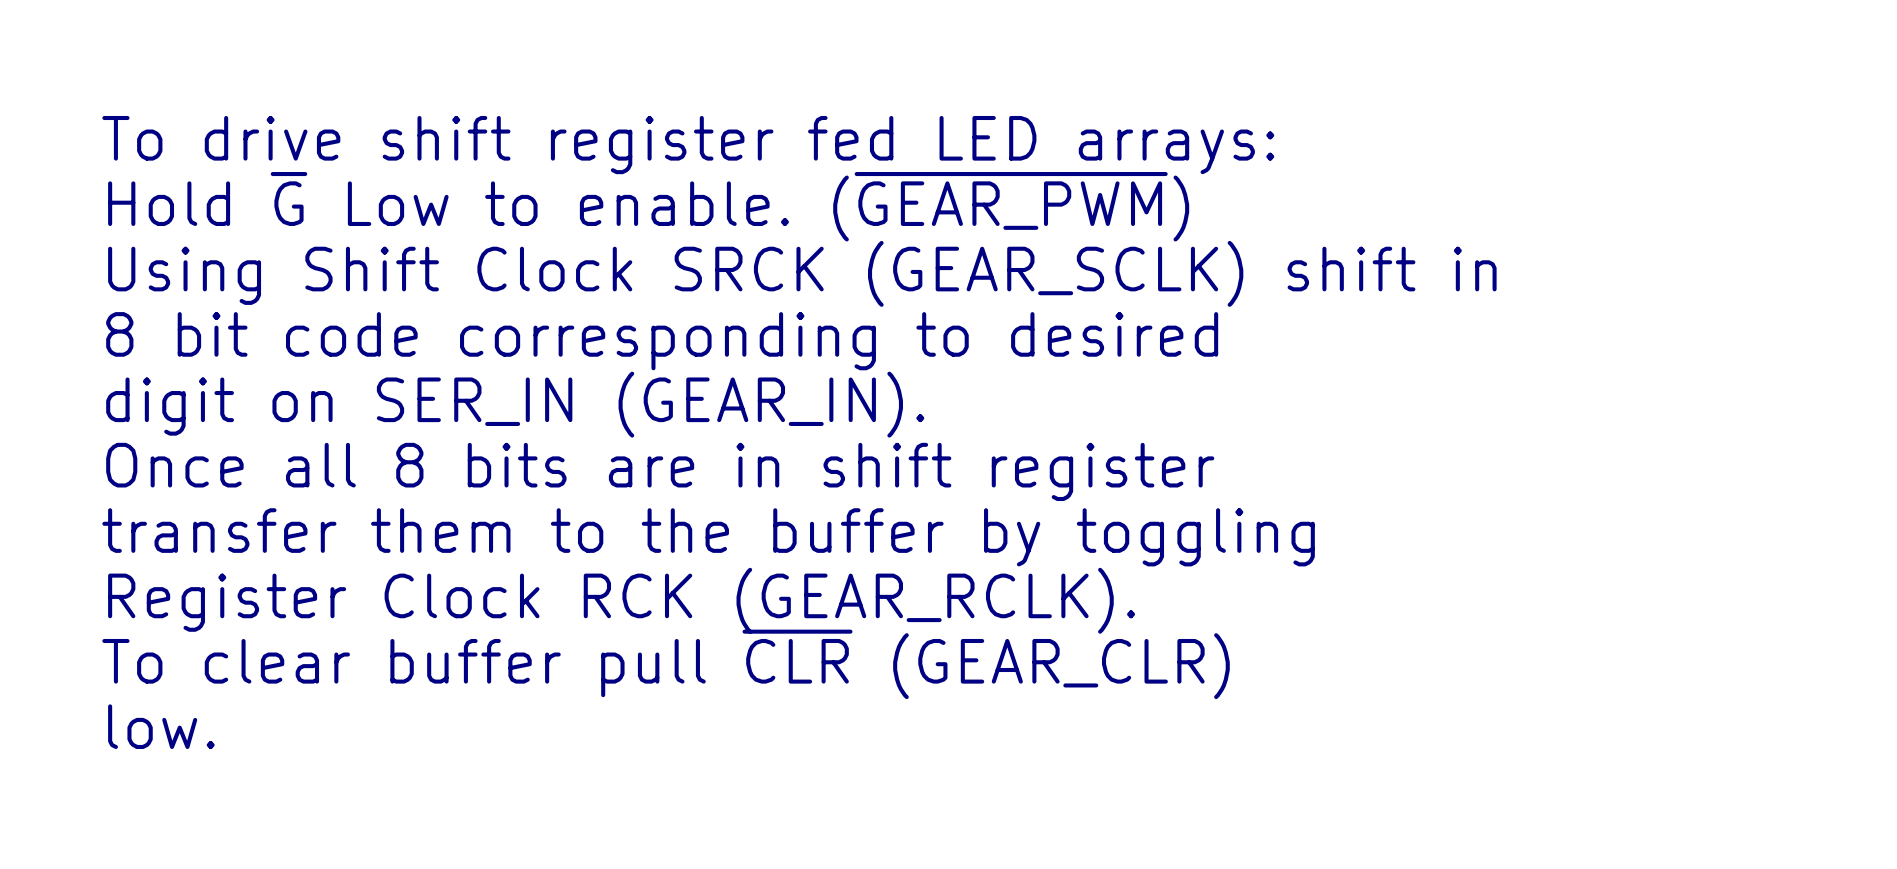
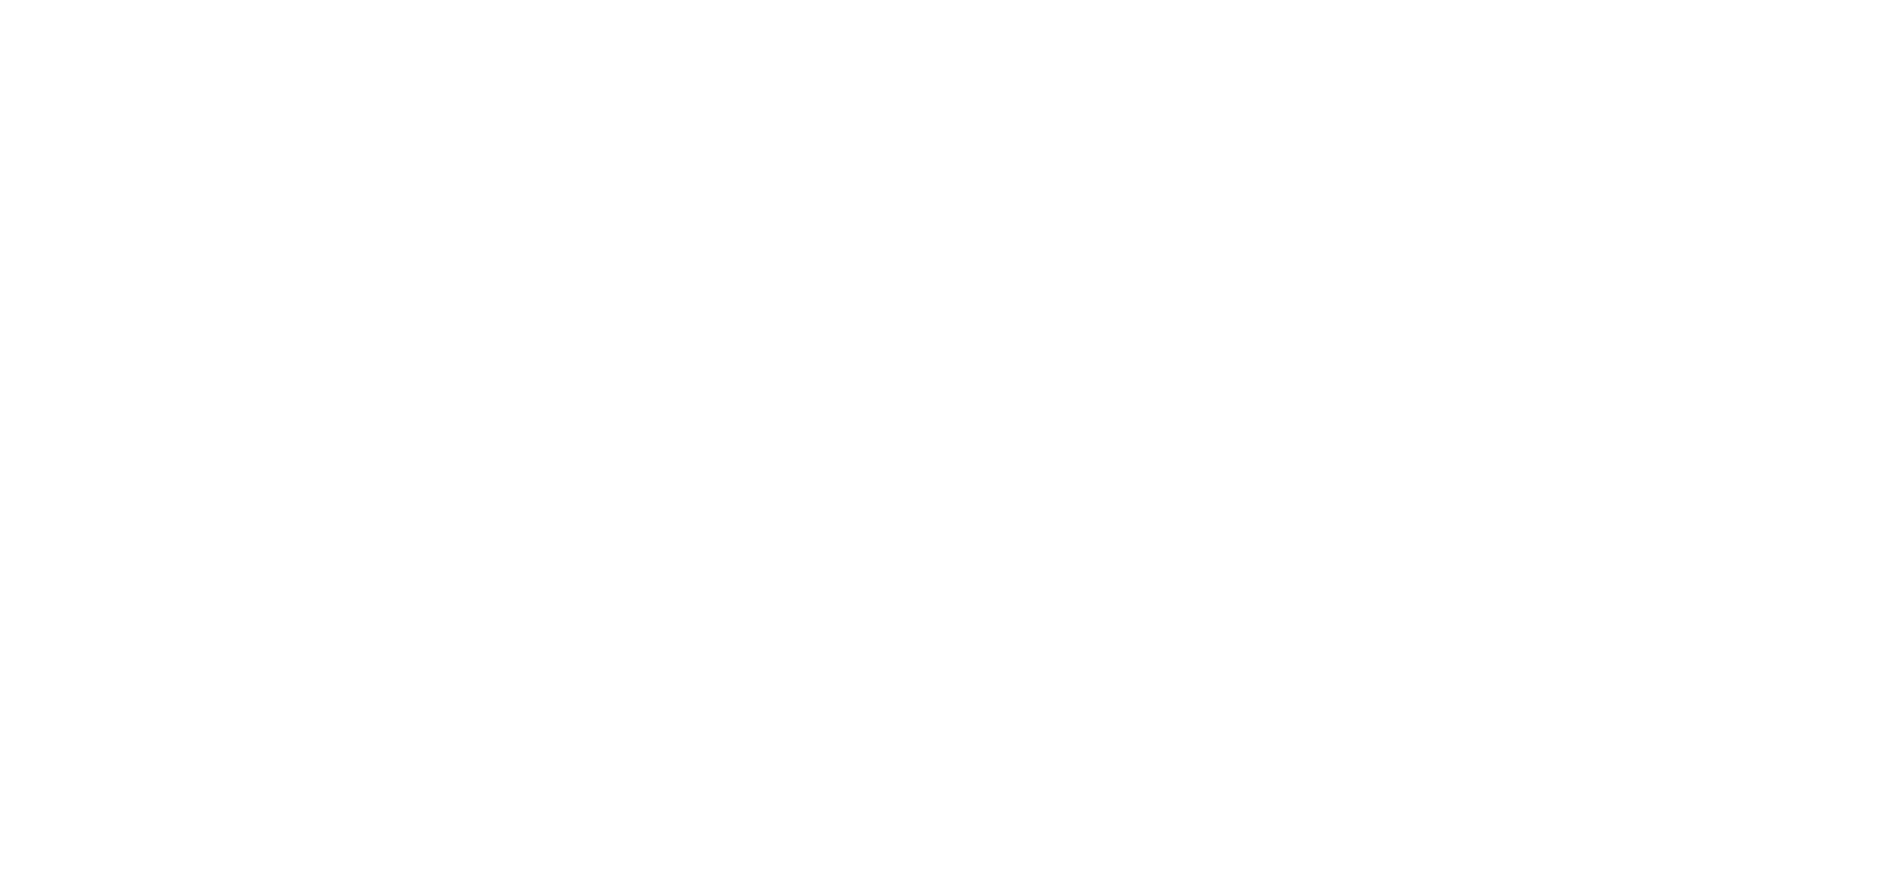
text: To drive shift register fed LED arrays: (688, 145) -> none
text: Hold ~{G} Low to enable. (~{GEAR_PWM}) (648, 206) -> none
text: Using Shift Clock SRCK (GEAR_SCLK) shift in (802, 273) -> none
text: 8 bit code corresponding to desired (662, 341) -> none
text: digit on SER_IN (GEAR_IN). (515, 404) -> none
text: Once all 8 bits are in shift register (660, 471) -> none
text: transfer them to the buffer by toggling (708, 537) -> none
text: Register Clock RCK (GEAR_RCLK). (621, 600) -> none
text: To clear buffer pull ~{CLR} (GEAR_CLR) (666, 664) -> none
text: low. (161, 726) -> none

